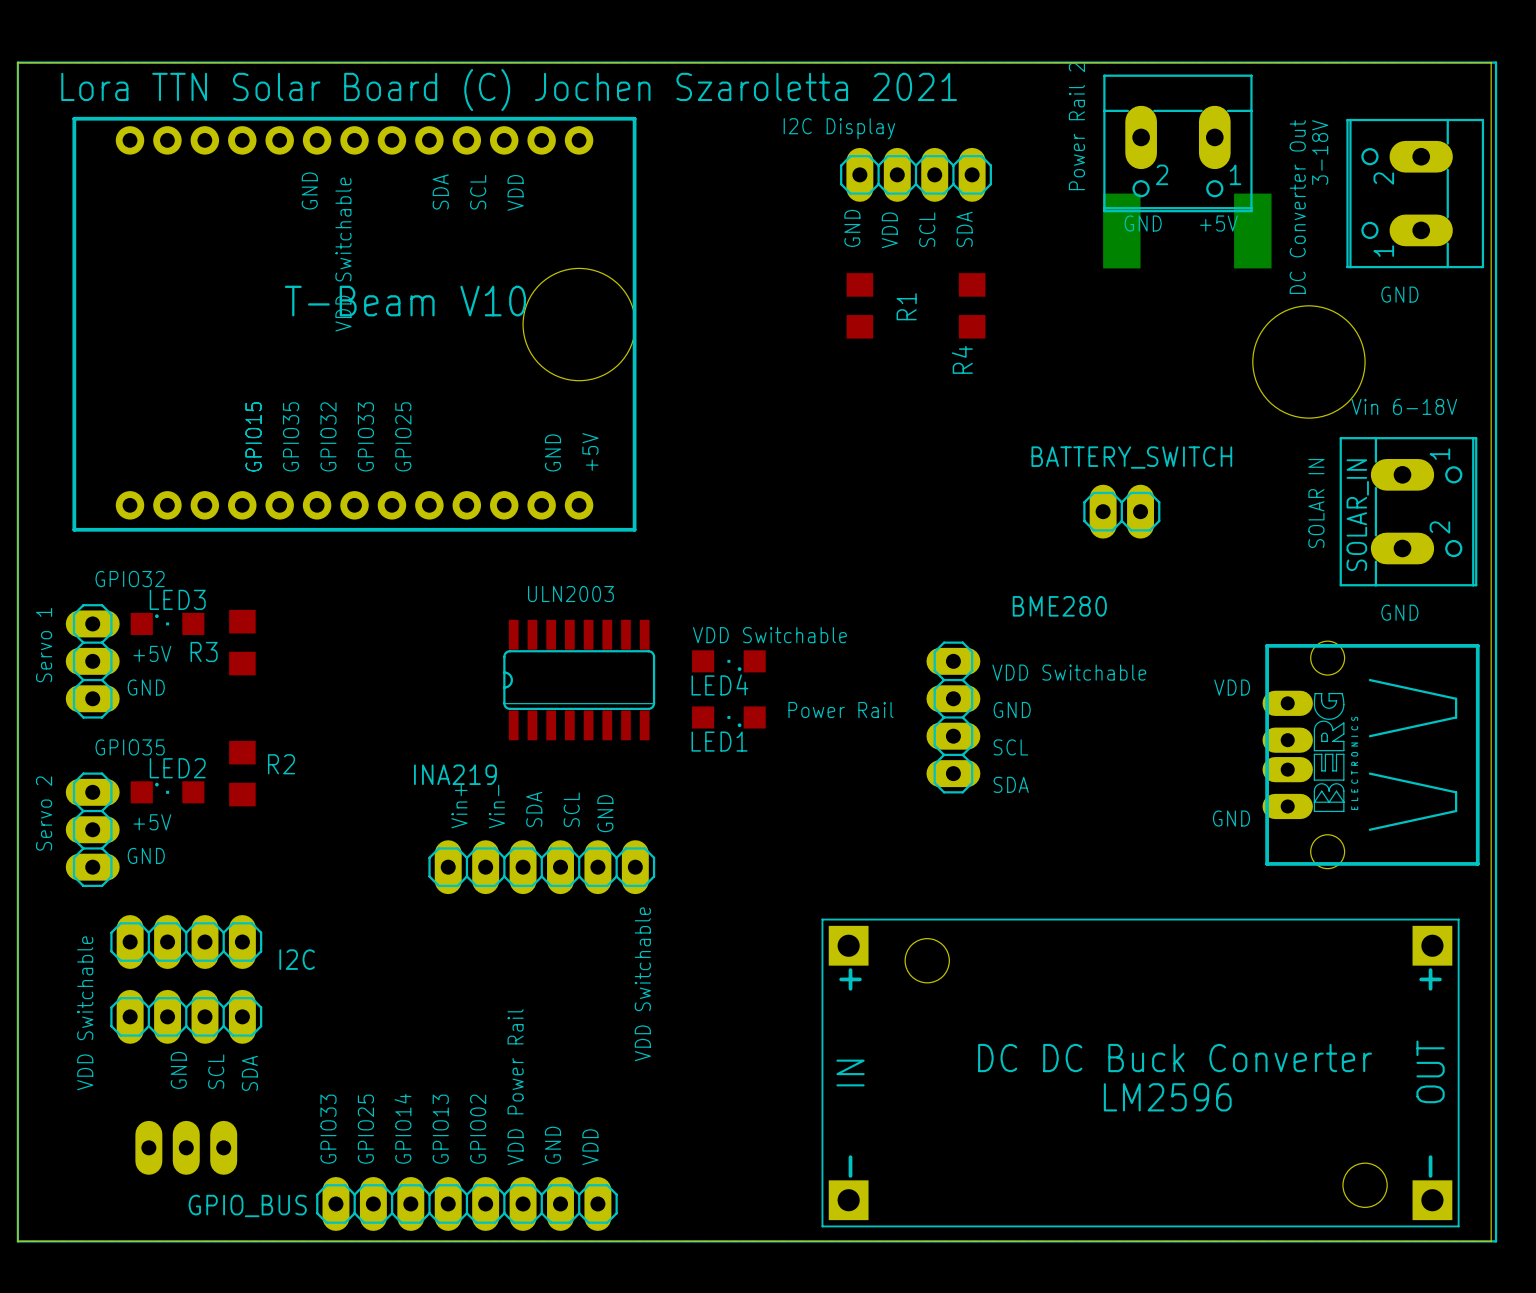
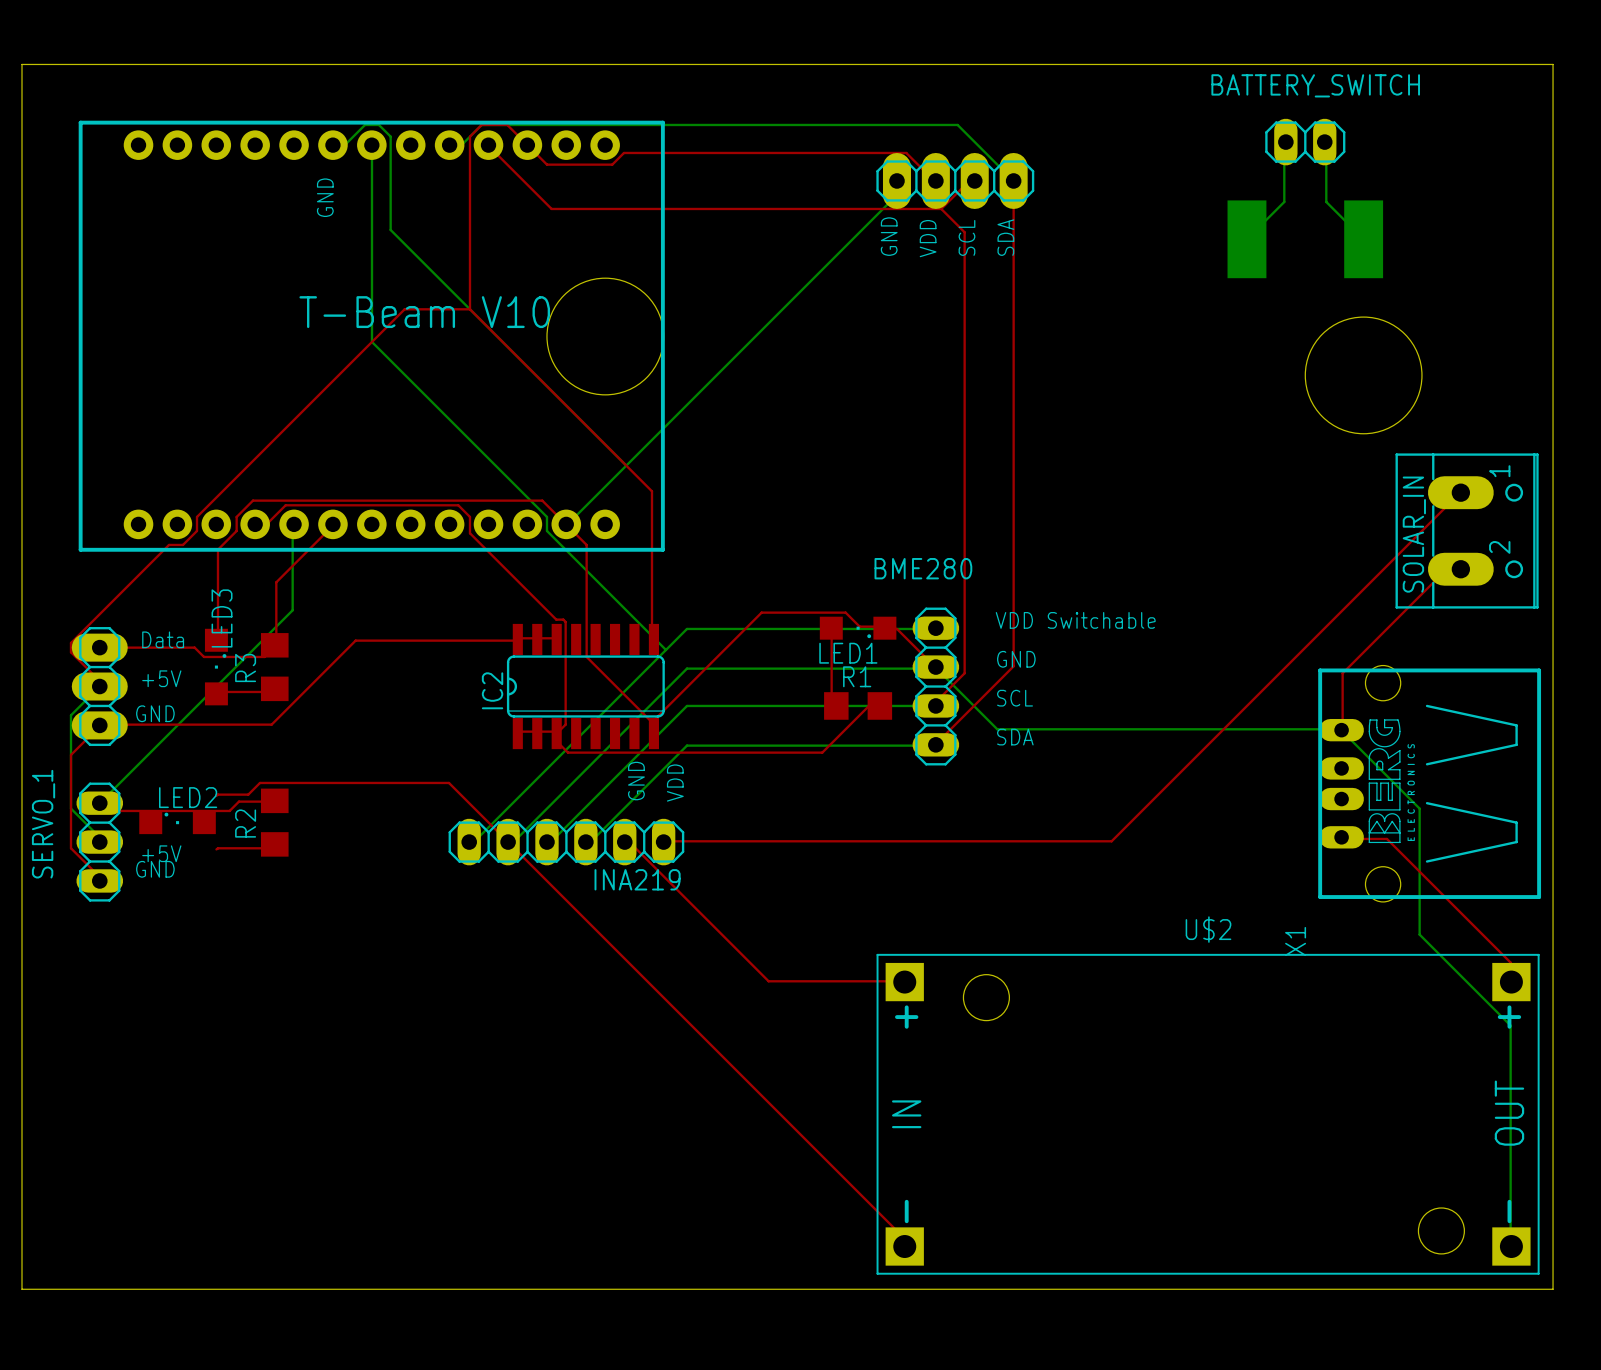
line: (17, 62) (1496, 62) (1496, 1241) (17, 1241) (17, 62) -> none
text: Lora TTN Solar Board (C) Jochen Szaroletta 2021 (509, 90) -> none
text: Power Rail 2 (1076, 126) -> none
text: I2C Display (839, 128) -> none
bottom track: none -> (1285, 142) (1284, 143) (1284, 201) (1246, 239)
BATTERY_SWITCH: none -> (1305, 142)
bottom track: none -> (1324, 142) (1326, 143) (1326, 201) (1363, 239)
bottom track: none -> (332, 145) (346, 143) (364, 124) (378, 124) (390, 136) (390, 229) (626, 465)
bottom track: none -> (371, 145) (371, 341) (546, 516) (546, 530) (665, 649)
bottom track: none -> (449, 145) (462, 143) (481, 124) (957, 124) (1013, 180)
top track: none -> (488, 145) (551, 208) (941, 208)
part: (1177, 143) -> none
text: 3-18V (1320, 152) -> none
bottom track: none -> (896, 180) (896, 194) (566, 524)
top track: none -> (935, 180) (906, 152) (623, 152) (612, 164) (546, 164) (507, 124) (481, 124) (469, 136) (469, 309)
top track: none -> (974, 180) (969, 180) (941, 208)
top track: none -> (1013, 180) (1013, 666) (935, 744)
text: SDA (440, 191) -> none
text: SCL (478, 192) -> none
text: VDD (515, 192) -> none
part: (1415, 193) -> none
top track: none -> (941, 208) (964, 232) (964, 673) (936, 701) (935, 705)
text: DC Converter Out (1297, 207) -> none
text: GND (1143, 223) -> none
text: +5V (1218, 223) -> none
part: (1121, 231) -> none
part: none -> (1246, 239)
part: (1252, 231) -> none
part: none -> (1363, 239)
text: VDD Switchable (343, 254) -> none
text: GND (1399, 294) -> none
top track: none -> (469, 309) (651, 491) (651, 638) (653, 639)
top track: none -> (469, 309) (404, 309) (196, 516) (196, 530) (182, 544) (168, 544) (70, 642) (70, 652) (98, 680) (99, 686)
R1 rotation: 0° (859, 305) -> 90° clockwise (858, 705)
R1 position: (859, 305) -> (858, 705)
R4: (972, 305) -> none
R1 name position: R1 (906, 306) -> R1 (857, 676)
text: Vin 6-18V (1404, 406) -> none
text: GPIO15 (253, 436) -> none
text: GPIO35 (291, 436) -> none
text: GPIO32 (328, 436) -> none
text: GPIO33 (365, 436) -> none
text: GPIO25 (403, 436) -> none
text: +5V (590, 451) -> none
text: GND (553, 452) -> none
top track: none -> (1460, 492) (1111, 841) (663, 842)
text: SOLAR IN (1316, 503) -> none
top track: none -> (255, 524) (266, 523) (285, 505) (458, 505) (469, 516) (469, 533) (556, 619) (563, 619) (565, 621) (565, 724) (556, 733)
bottom track: none -> (294, 524) (292, 610) (99, 803)
top track: none -> (332, 524) (276, 582) (276, 645) (264, 656) (203, 656) (194, 647) (99, 647)
BATTERY_SWITCH: (1121, 511) -> none
top track: none -> (1460, 569) (1445, 570) (1342, 673) (1341, 730)
text: GPIO32 (130, 579) -> none
text: ULN2003 (570, 593) -> none
top track: none -> (831, 628) (831, 701) (836, 705)
bottom track: none -> (935, 628) (686, 628) (474, 841) (469, 842)
BME280 name position: BME280 (1059, 606) -> BME280 (923, 568)
text: GND (1399, 612) -> none
text: none -> Data (163, 639)
top track: none -> (216, 640) (217, 638) (217, 549) (236, 530) (236, 516) (252, 500) (542, 500) (586, 544) (586, 656) (651, 722)
top track: none -> (556, 639) (355, 640) (271, 724) (99, 725) (70, 754) (70, 848) (98, 876) (99, 880)
LED3 rotation: 0° (167, 623) -> 90° clockwise (216, 667)
text: VDD Switchable (769, 635) -> none
BME280 footprint: [926, 641, 981, 794] -> [912, 607, 960, 766]
R3 position: (242, 642) -> (274, 667)
top track: none -> (935, 667) (896, 628) (859, 626) (845, 612) (761, 612) (651, 722)
text: Servo 1 (44, 645) -> none
R3 name rotation: 0° (204, 651) -> 90° counterclockwise (245, 667)
bottom track: none -> (99, 686) (70, 715) (70, 808) (98, 836) (99, 842)
IC2: none -> (585, 686)
LED4: (728, 661) -> none
top track: none -> (274, 688) (271, 691) (217, 691) (216, 693)
text position: VDD Switchable (1069, 672) -> VDD Switchable (1075, 620)
part: (579, 680) -> none
top track: none -> (879, 705) (868, 705) (822, 752) (567, 752) (558, 743) (558, 733) (556, 733)
bottom track: none -> (935, 705) (686, 705) (551, 841) (546, 842)
text: VDD (1232, 687) -> none
top track: none -> (517, 733) (518, 731) (535, 731) (537, 733) (537, 731) (556, 731) (556, 733)
text: Power Rail (840, 710) -> none
text position: GND (1012, 710) -> GND (1016, 659)
LED1 position: (728, 717) -> (858, 628)
bottom track: none -> (935, 744) (686, 745) (591, 841) (585, 842)
text: GPIO35 (130, 747) -> none
text position: SCL (1010, 747) -> SCL (1015, 698)
text: none -> VDD (675, 783)
part: (1371, 754) -> none
X1: none -> (1429, 783)
R2 name rotation: 0° (281, 764) -> 90° counterclockwise (245, 823)
R2 name position: R2 (281, 764) -> R2 (245, 823)
top track: none -> (216, 795) (248, 794) (259, 782) (448, 782) (903, 1237) (904, 1246)
top track: none -> (274, 800) (238, 801) (229, 810) (108, 810) (99, 803)
R2 position: (242, 773) -> (274, 822)
INA219 name position: INA219 (455, 774) -> INA219 (637, 879)
text position: SDA (1011, 784) -> SDA (1015, 737)
text: Vin+ (459, 806) -> none
text: Vin- (496, 806) -> none
top track: none -> (1341, 837) (1342, 838) (1386, 838) (1510, 962) (1511, 982)
text: SDA (534, 809) -> none
text: SCL (571, 809) -> none
SERVO_1: none -> (99, 842)
bottom track: none -> (508, 842) (514, 841) (686, 668) (934, 668) (935, 667) (997, 729) (1340, 729) (1419, 808) (1419, 934) (1510, 1025) (1511, 1246)
top track: none -> (624, 842) (630, 843) (768, 981) (904, 982)
text: Servo 2 (44, 813) -> none
top track: none -> (274, 844) (271, 848) (216, 849)
text position: GND (605, 813) -> GND (636, 781)
text: GND (1231, 818) -> none
part: (92, 829) -> none
INA219 footprint: [428, 840, 656, 895] -> [448, 818, 685, 866]
text position: GND (146, 855) -> GND (155, 869)
I2C: (186, 942) -> none
text: VDD Switchable (642, 984) -> none
text: VDD Switchable (85, 1013) -> none
part: (186, 1016) -> none
text: DC DC Buck Converter (1175, 1058) -> none
text: GND (178, 1070) -> none
text: SCL (216, 1071) -> none
part: (1140, 1072) -> none
U$2: none -> (1208, 1114)
text: SDA (249, 1073) -> none
text: VDD Power Rail (515, 1087) -> none
text: LM2596 (1167, 1097) -> none
text: GPIO14 (402, 1128) -> none
text: GPIO33 (328, 1129) -> none
text: GPIO25 (365, 1129) -> none
text: GPIO13 (440, 1129) -> none
text: GPIO02 (478, 1129) -> none
text: GND (553, 1145) -> none
part: (186, 1147) -> none
text: VDD (590, 1147) -> none
GPIO_BUS: (466, 1203) -> none

